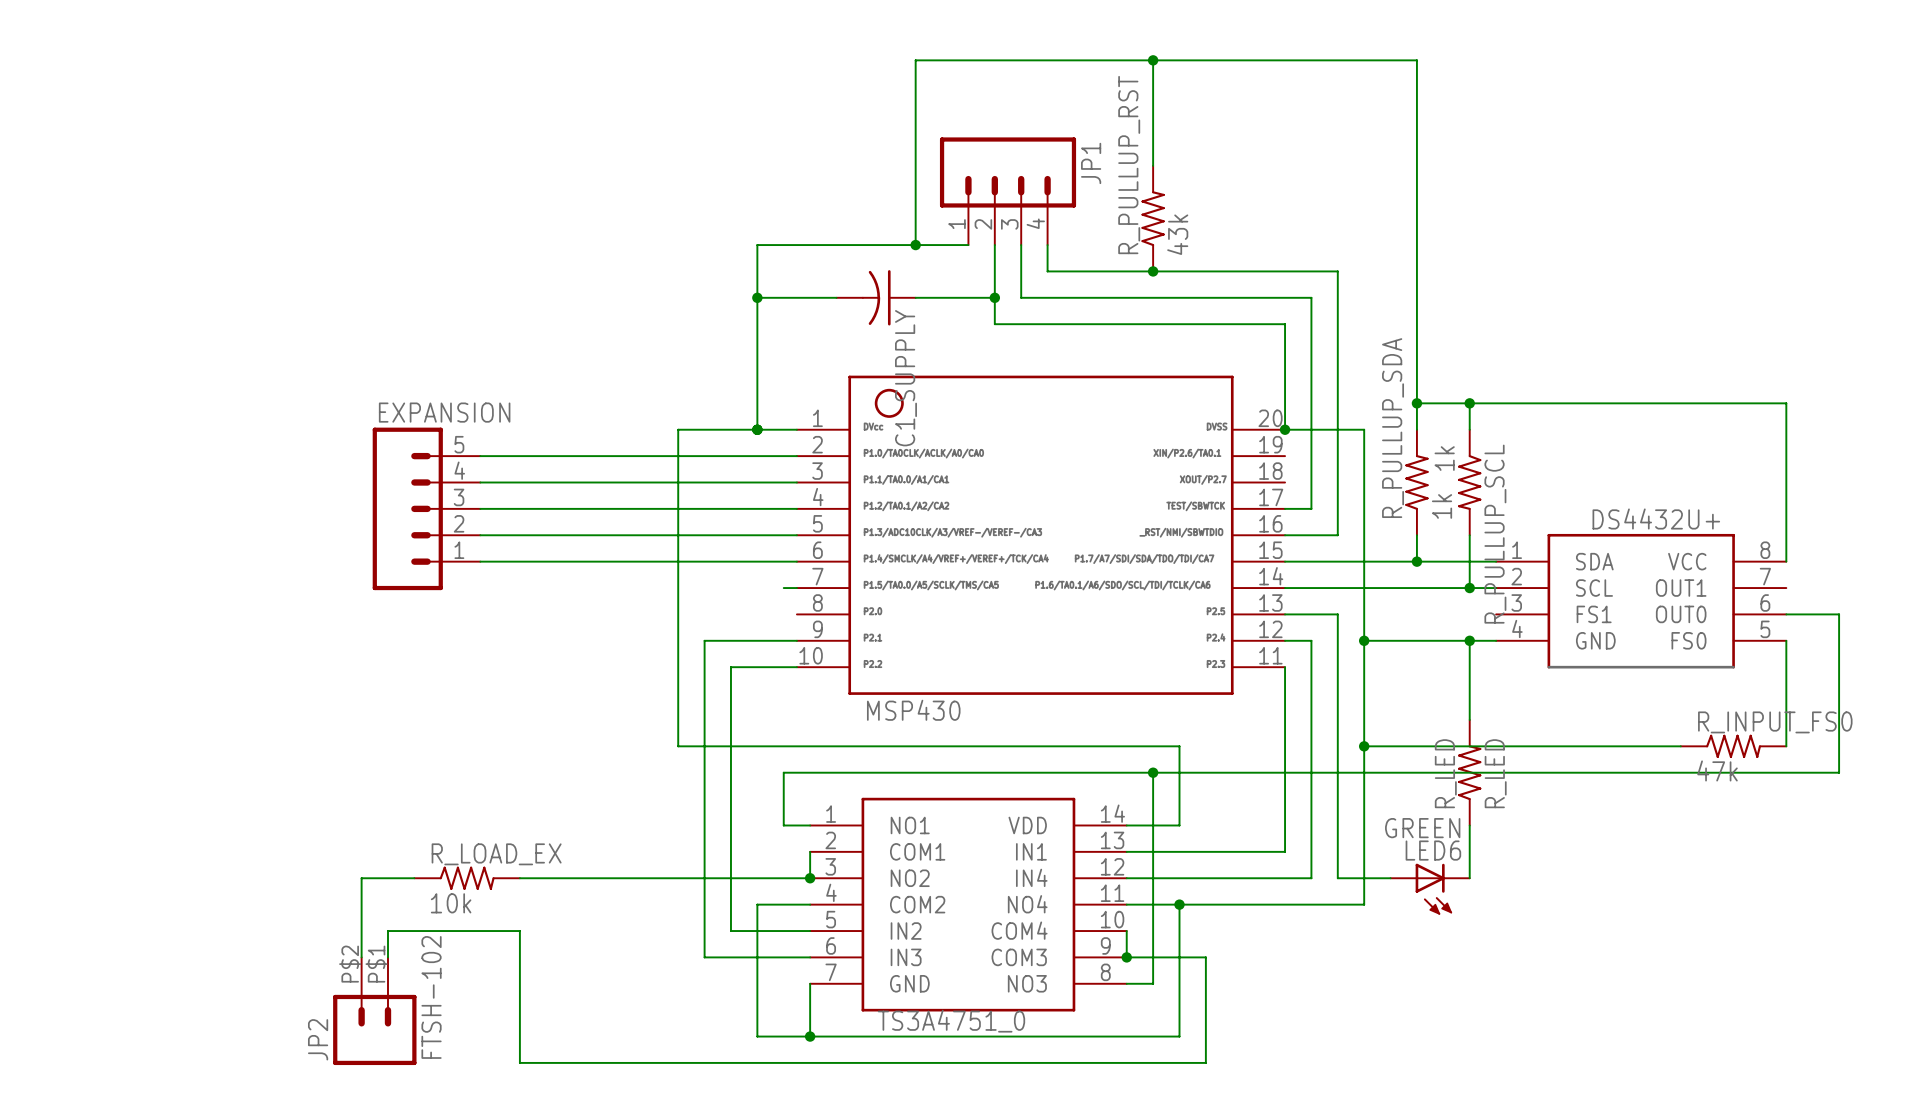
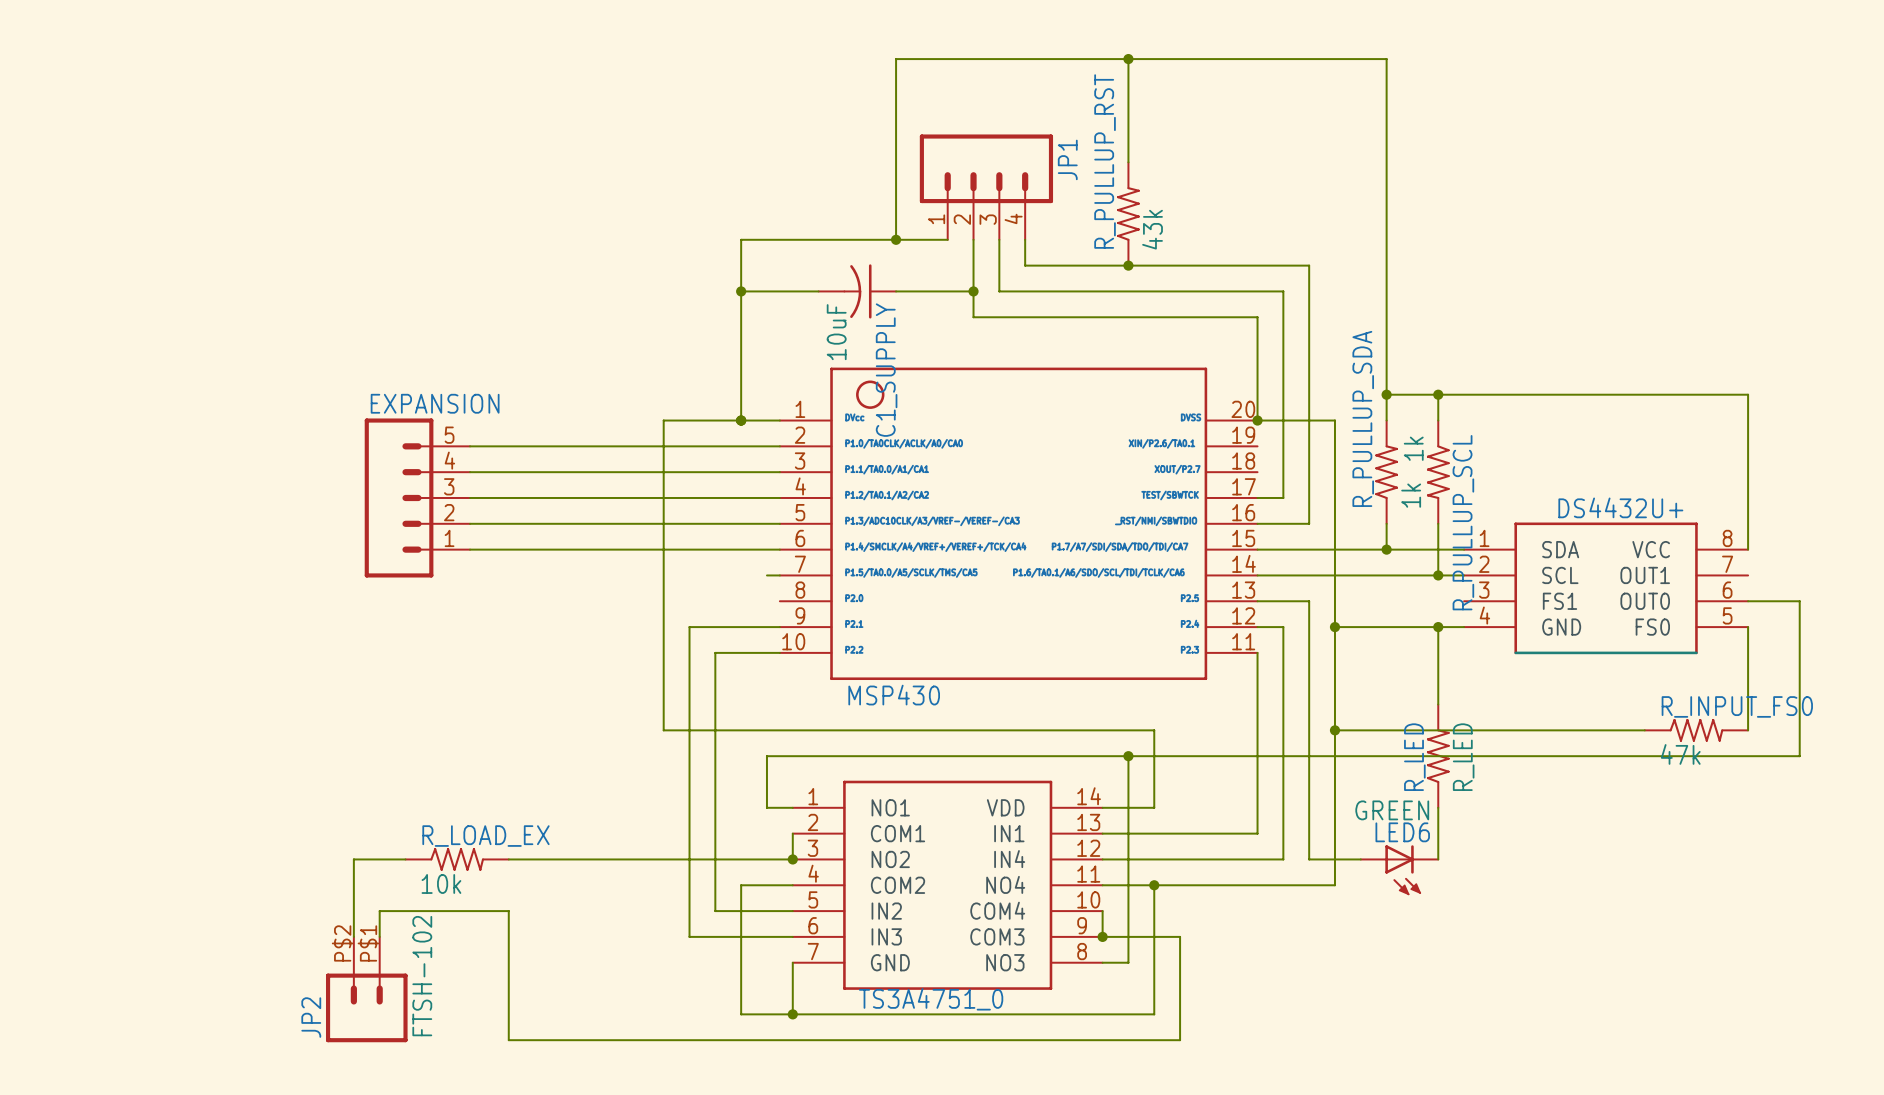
C1_SUPPLY value: none -> 10uF (836, 332)

